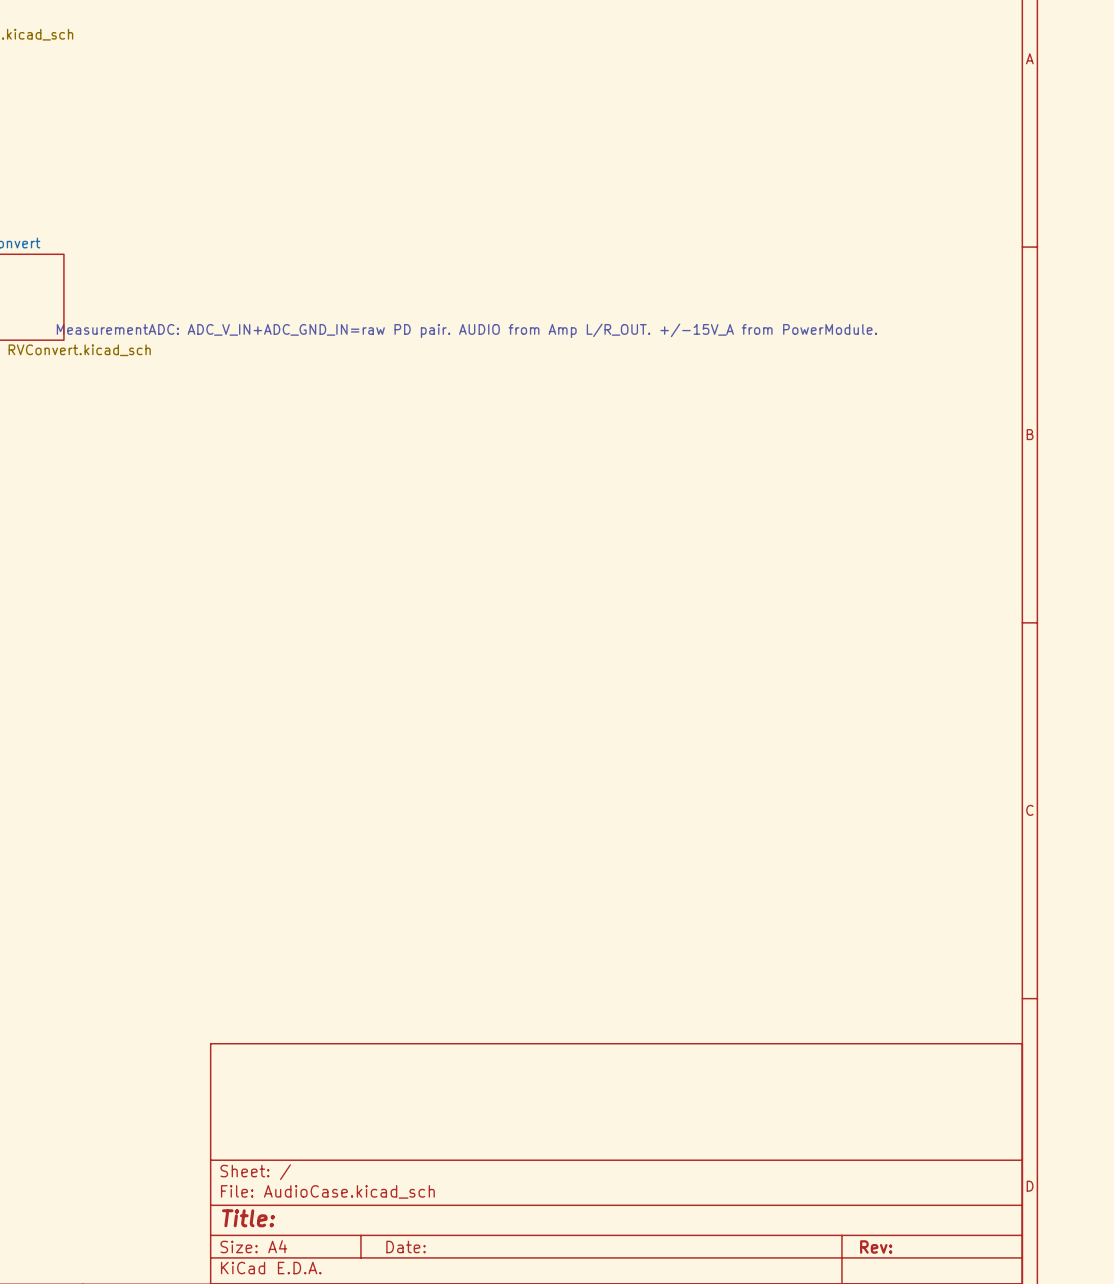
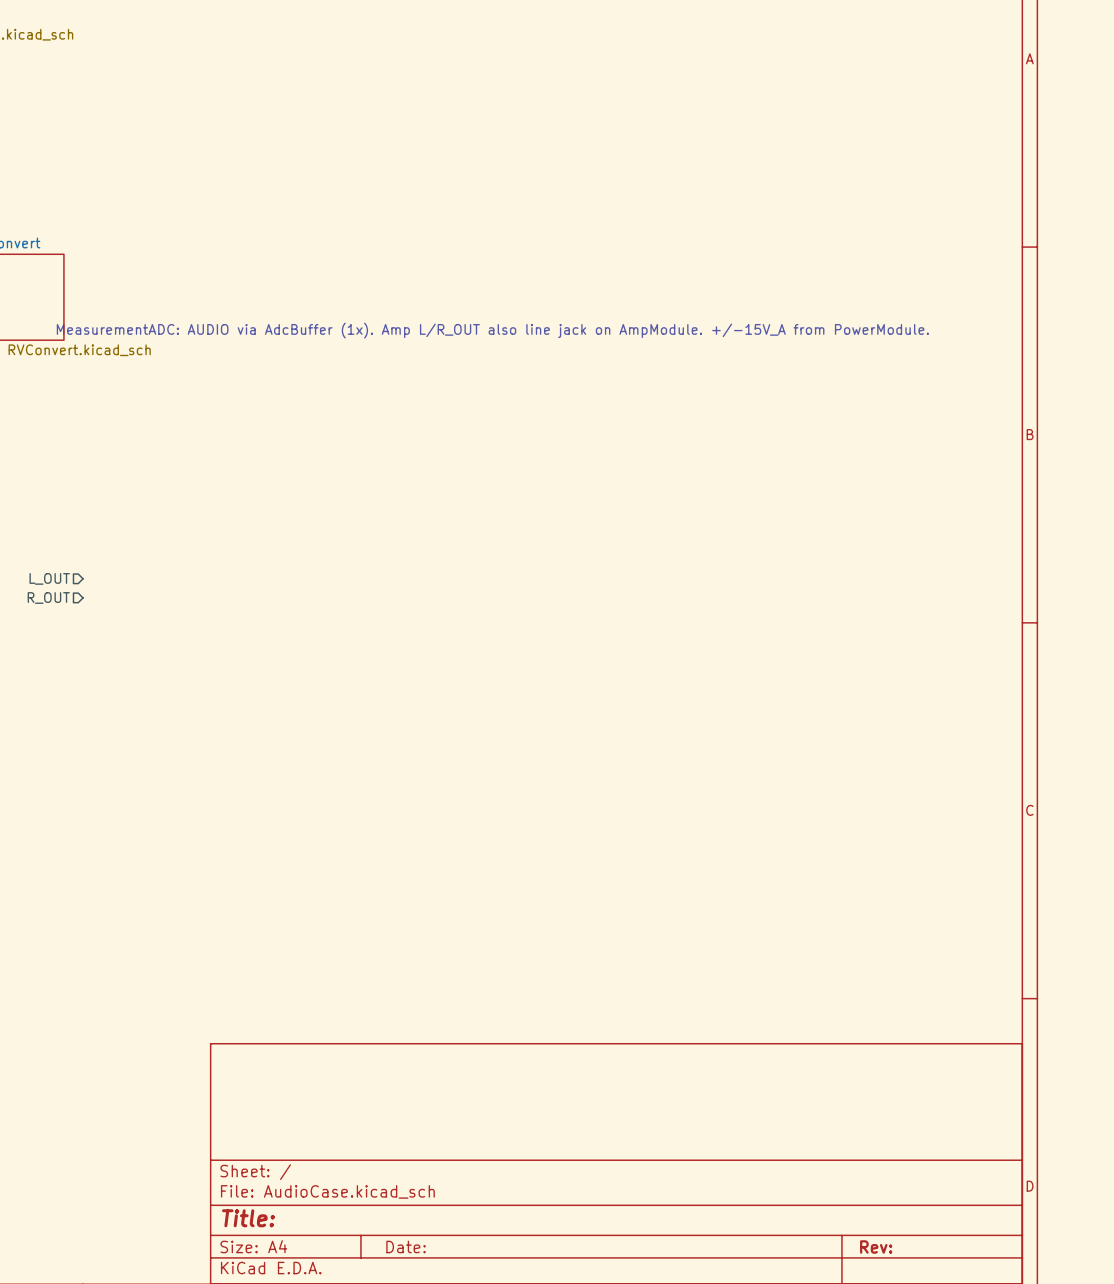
text: MeasurementADC: ADC_V_IN+ADC_GND_IN=raw PD pair. AUDIO from Amp L/R_OUT. +/-15V_A from PowerModule. (466, 330) -> MeasurementADC: AUDIO via AdcBuffer (1x). Amp L/R_OUT also line jack on AmpModule. +/-15V_A from PowerModule. (492, 330)
sheet pin: none -> L_OUT (49, 578)
sheet pin: none -> R_OUT (48, 597)

